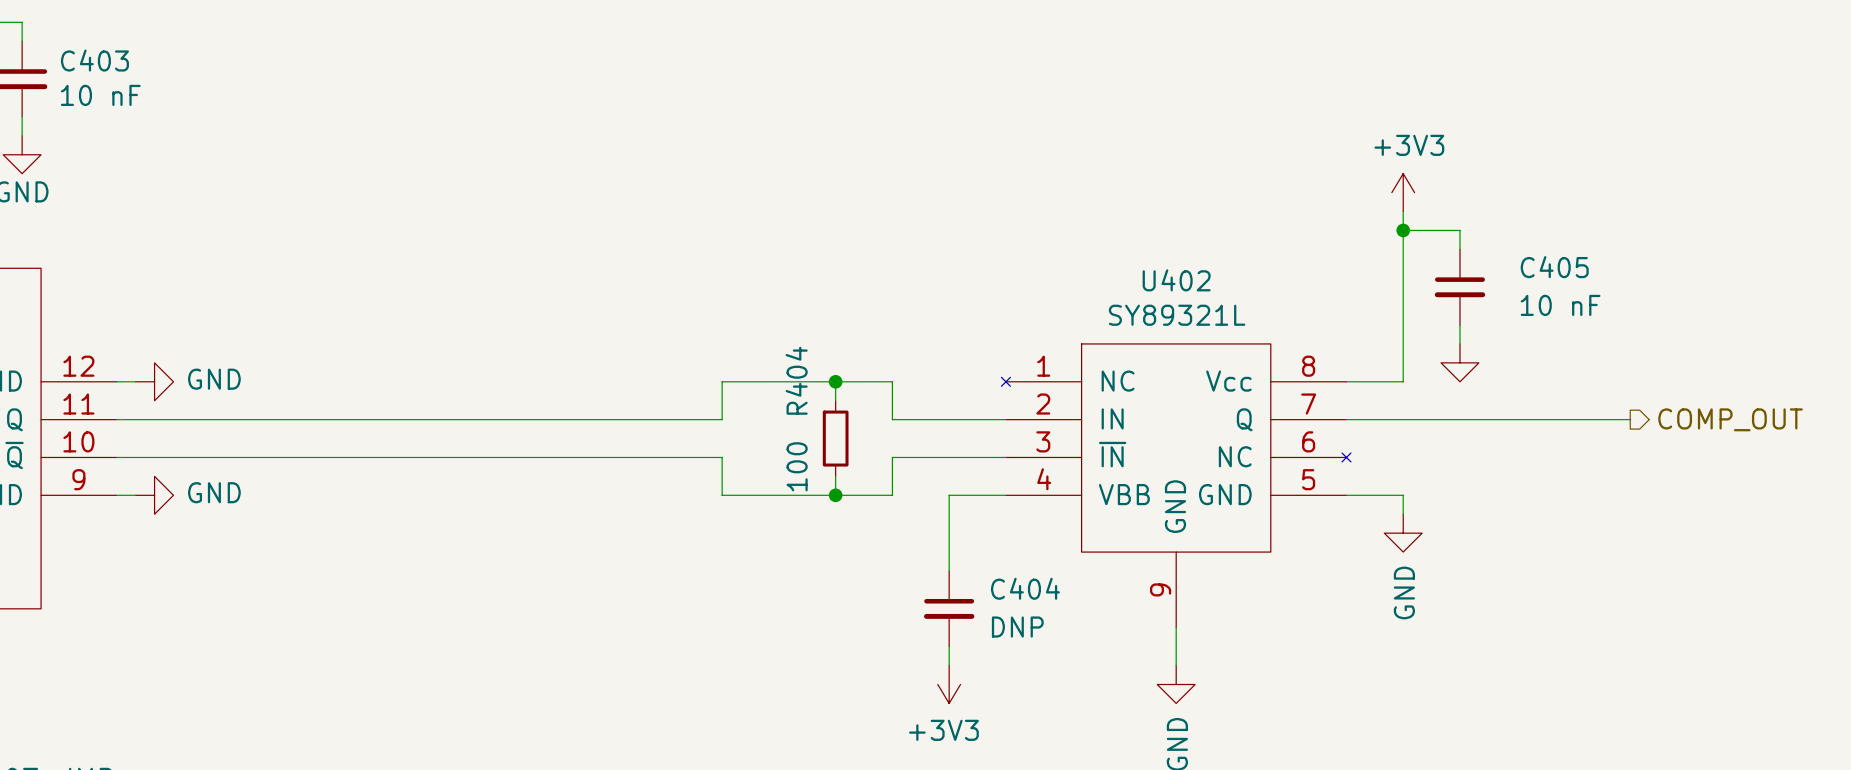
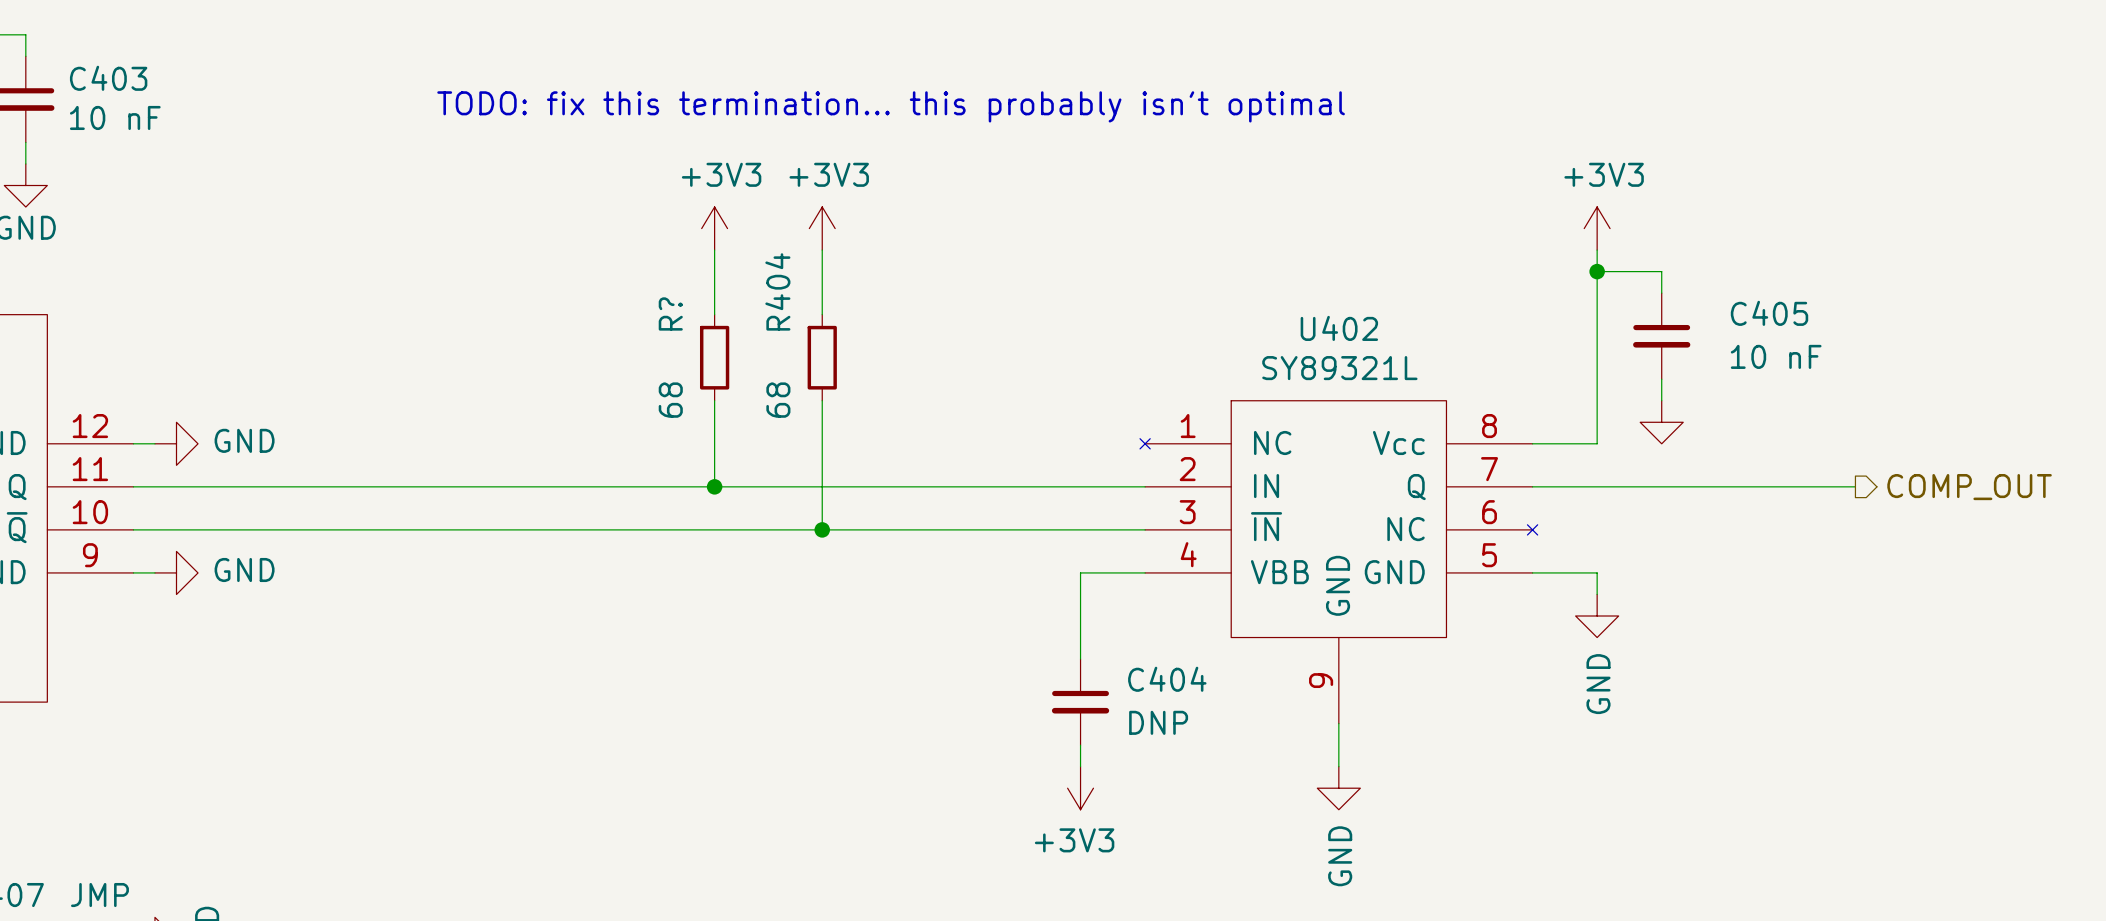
text: none -> TODO: fix this termination... this probably isn't optimal (891, 106)
power symbol: none -> +3V3 (714, 228)
power symbol: none -> +3V3 (822, 228)
wire: none -> (714, 250) (714, 314)
wire: none -> (822, 250) (822, 314)
R?: none -> 68 (714, 357)
wire: none -> (714, 400) (714, 486)
wire: (722, 381) (892, 381) (892, 419) -> (822, 443) (822, 400)
wire: (835, 381) (835, 400) -> none
junction: (835, 381) -> none
junction: none -> (714, 486)
R404 position: (835, 438) -> (822, 357)
wire: (722, 457) (722, 495) (892, 495) (892, 457) -> (1015, 486) (822, 486) (822, 529) (1015, 529)
junction: none -> (822, 529)
R404 value: 100 (797, 466) -> 68 (778, 400)
wire: (835, 476) (835, 495) -> none
junction: (835, 495) -> none

